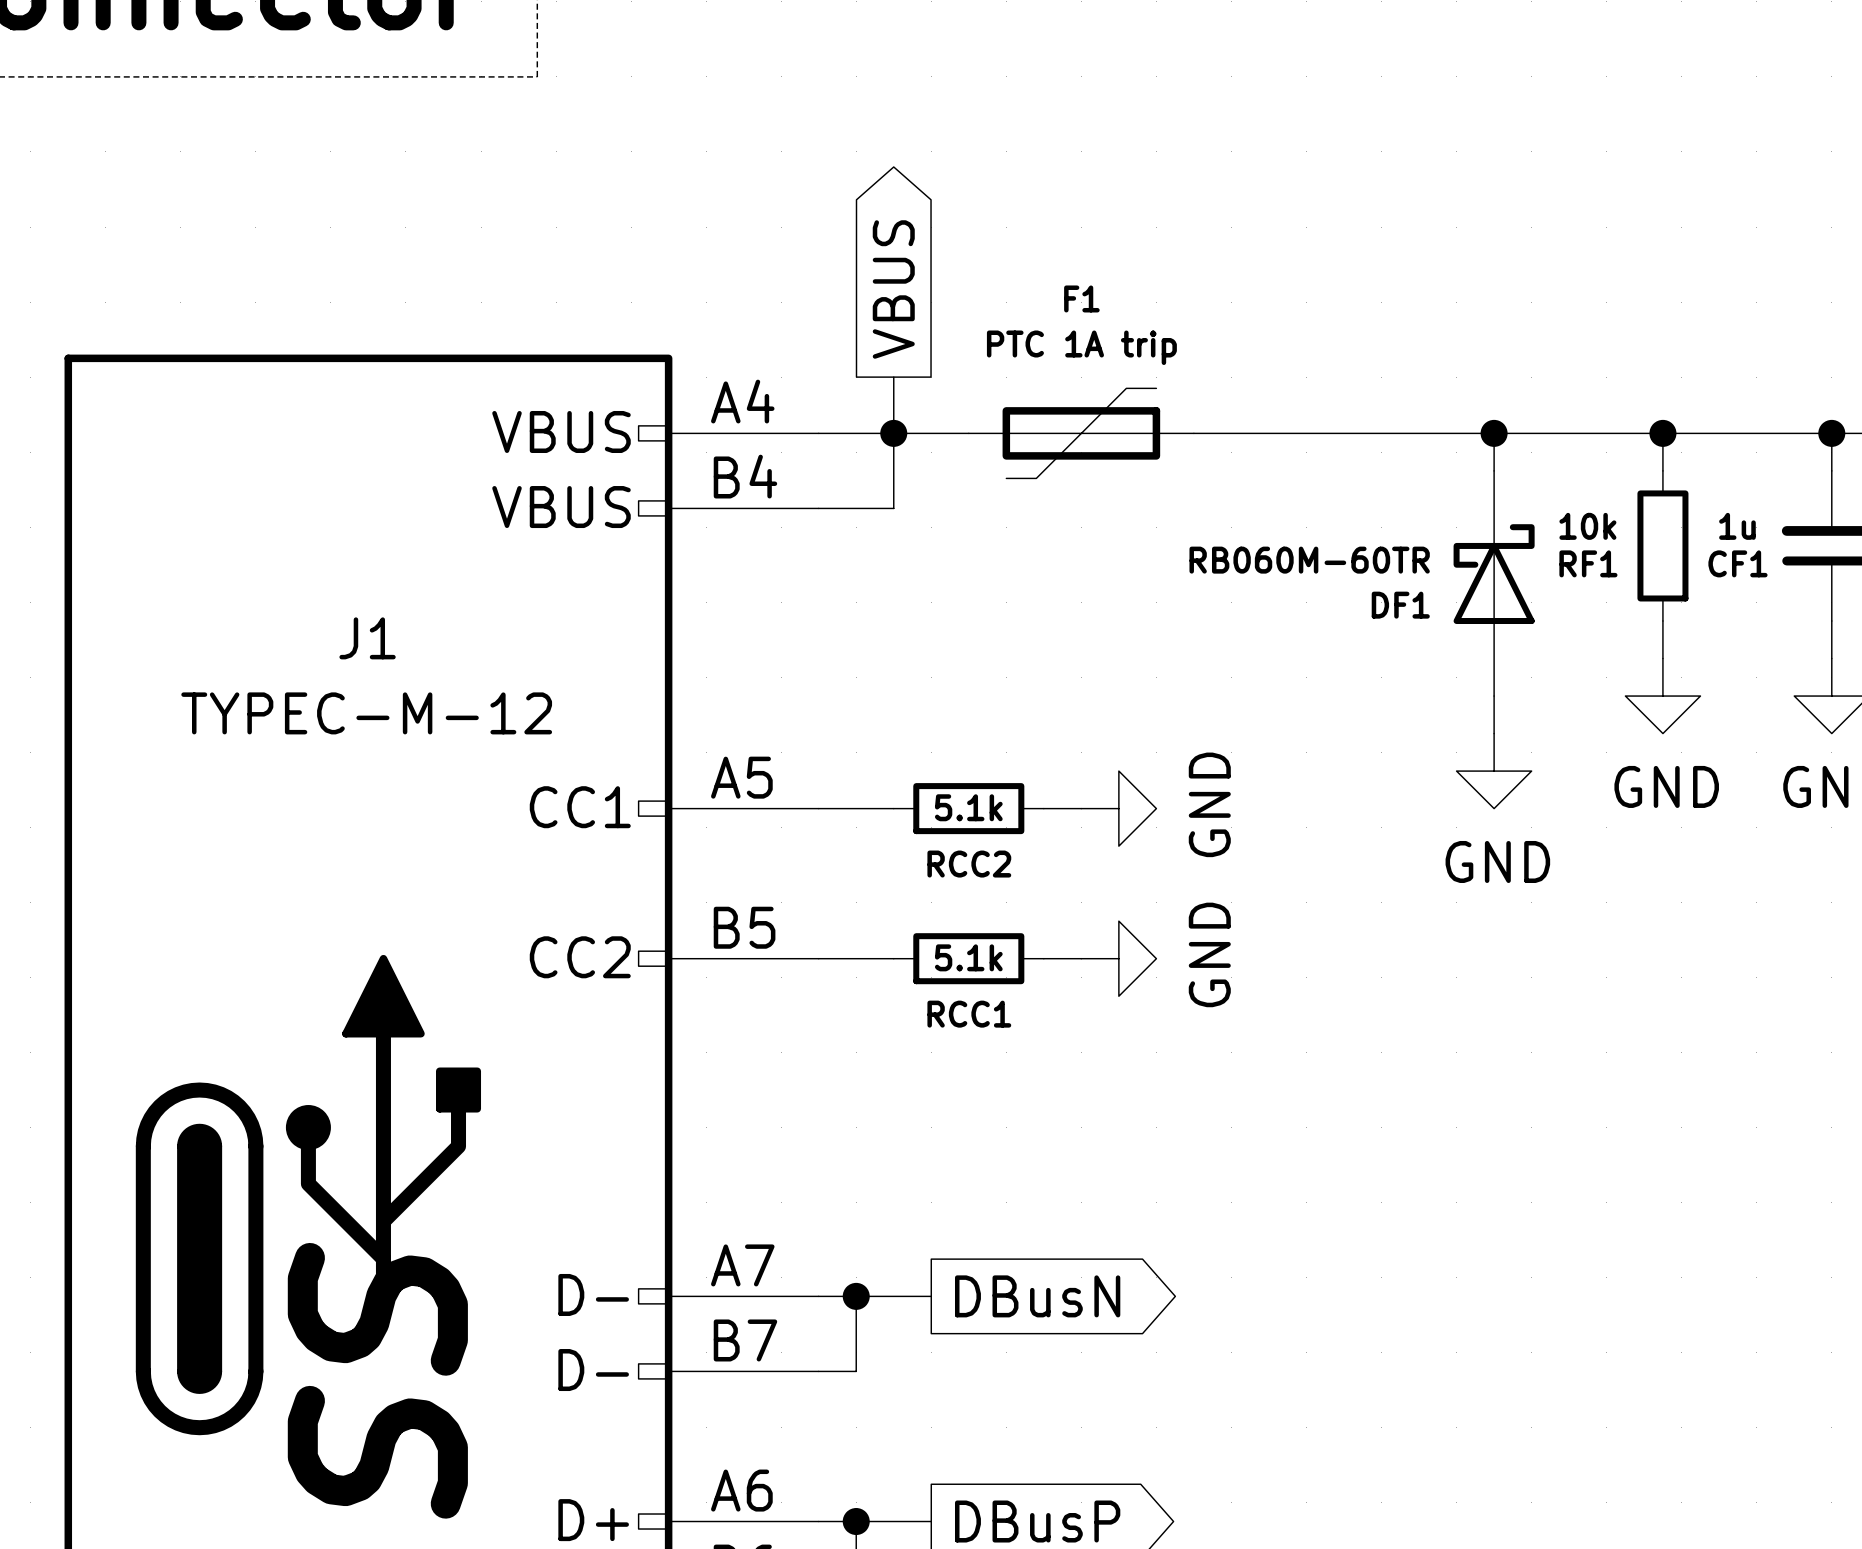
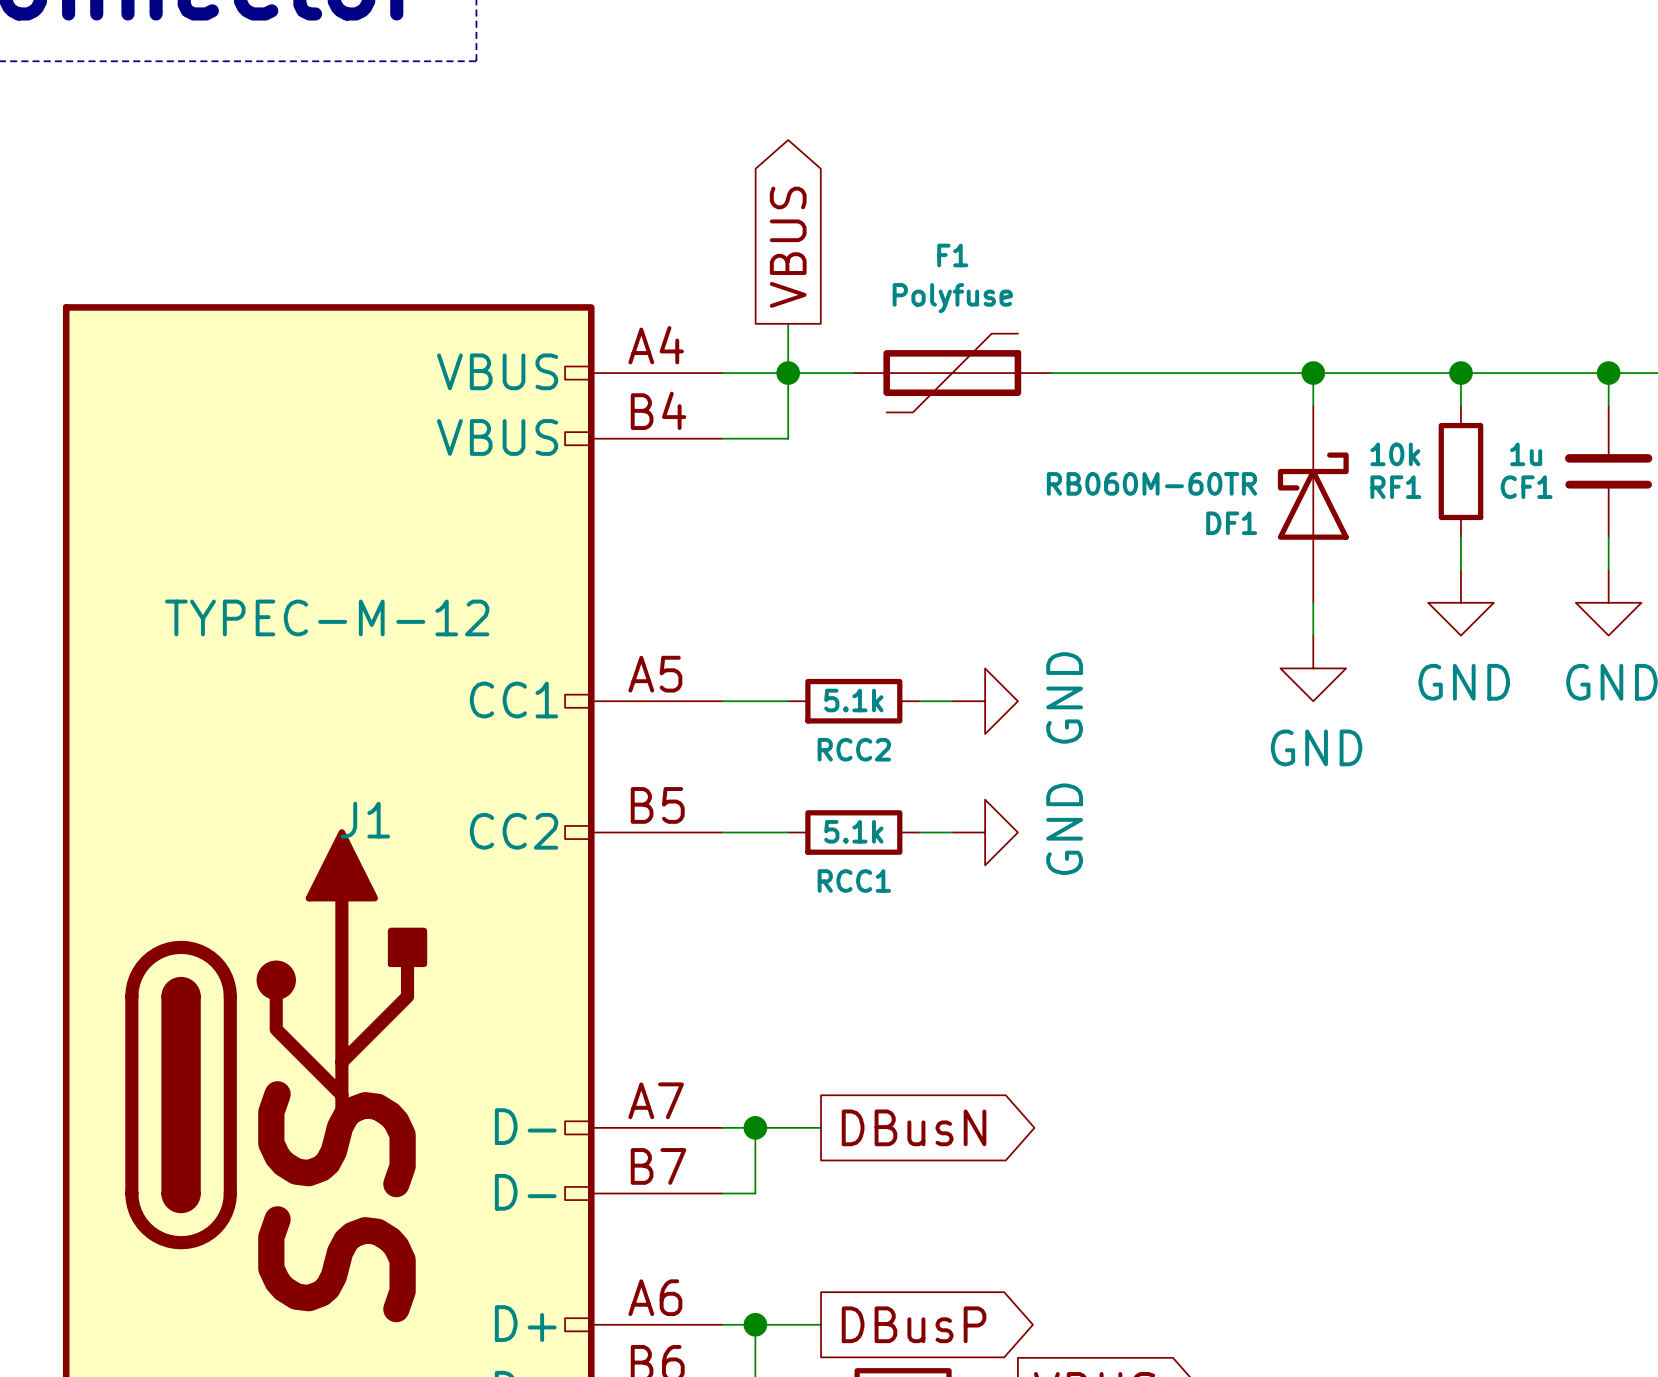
F1 value: PTC 1A trip (1081, 347) -> Polyfuse (952, 298)
J1 name position: J1 (367, 638) -> J1 (365, 820)

